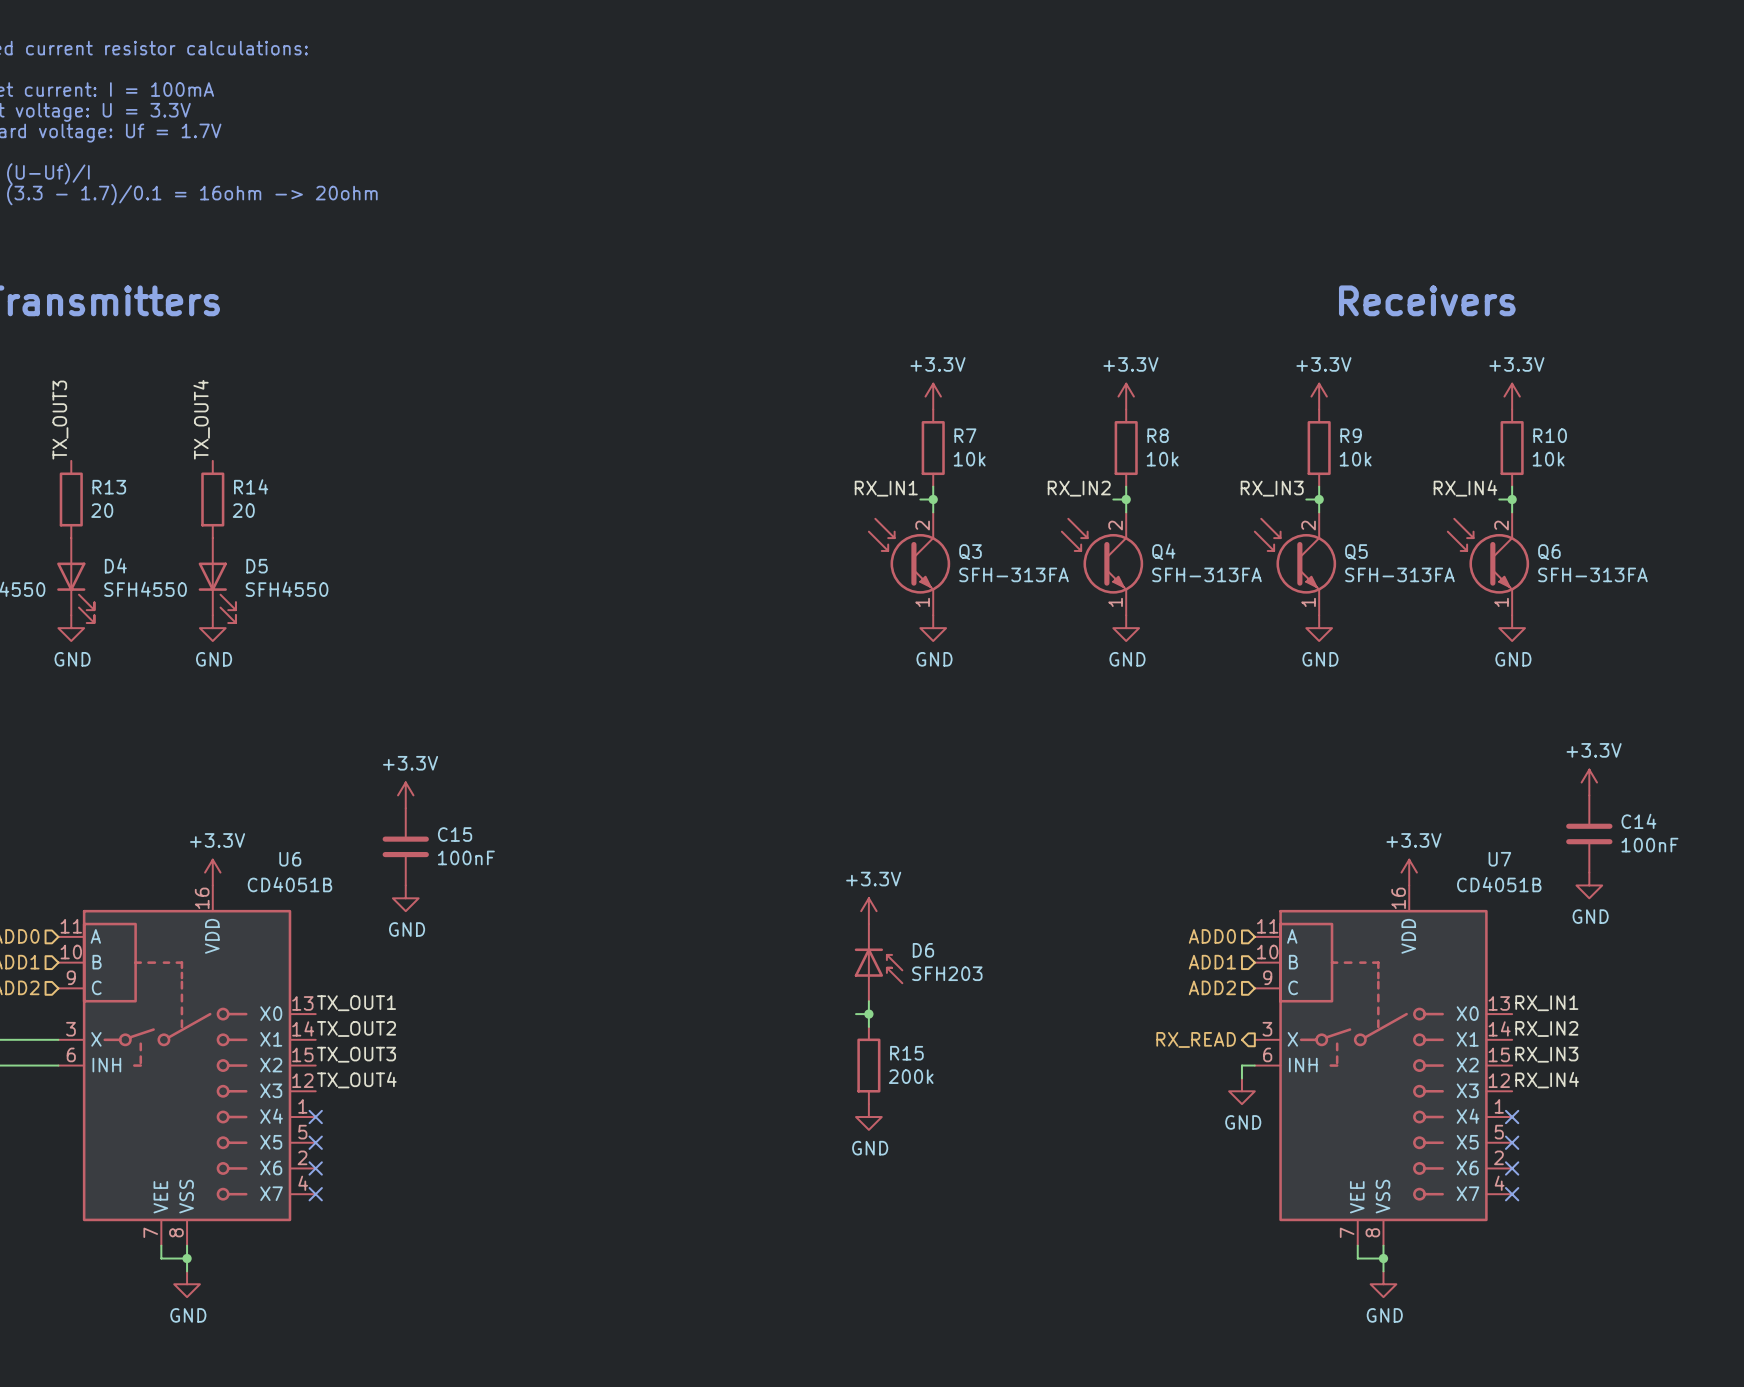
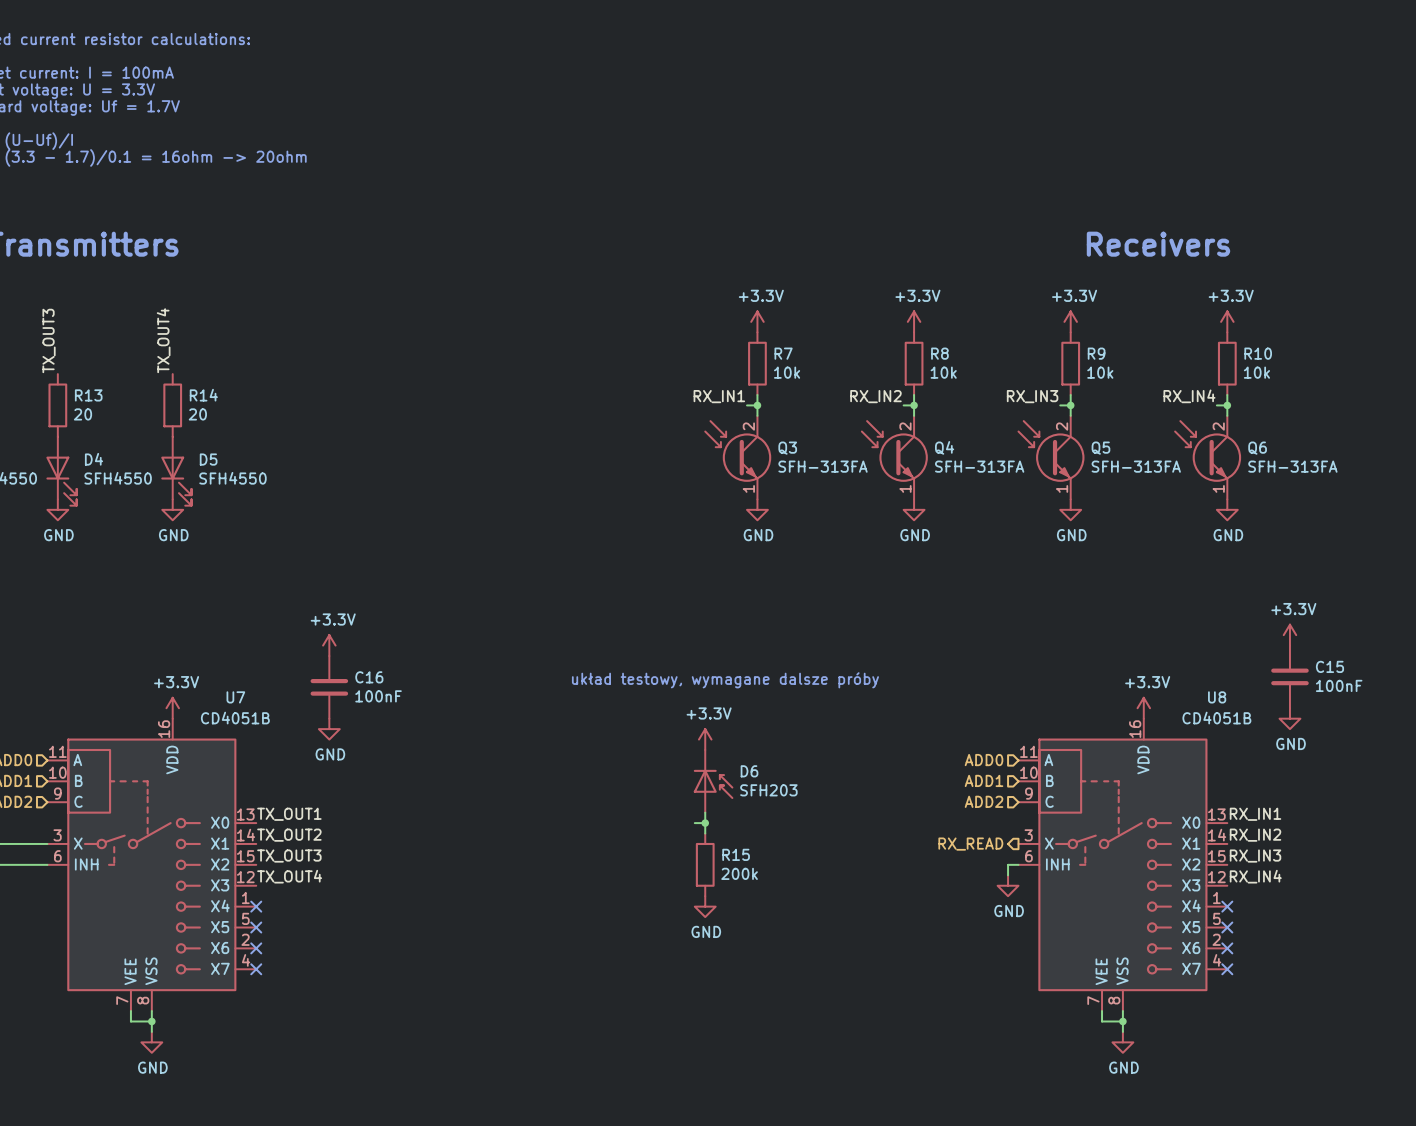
C14 name: C14 (1638, 821) -> C15 (1329, 666)
C15 name: C15 (455, 834) -> C16 (369, 677)
text: none -> układ testowy, wymagane dalsze próby (725, 680)
U6 name: U6 (290, 859) -> U7 (235, 697)
U7 name: U7 (1499, 859) -> U8 (1217, 697)

